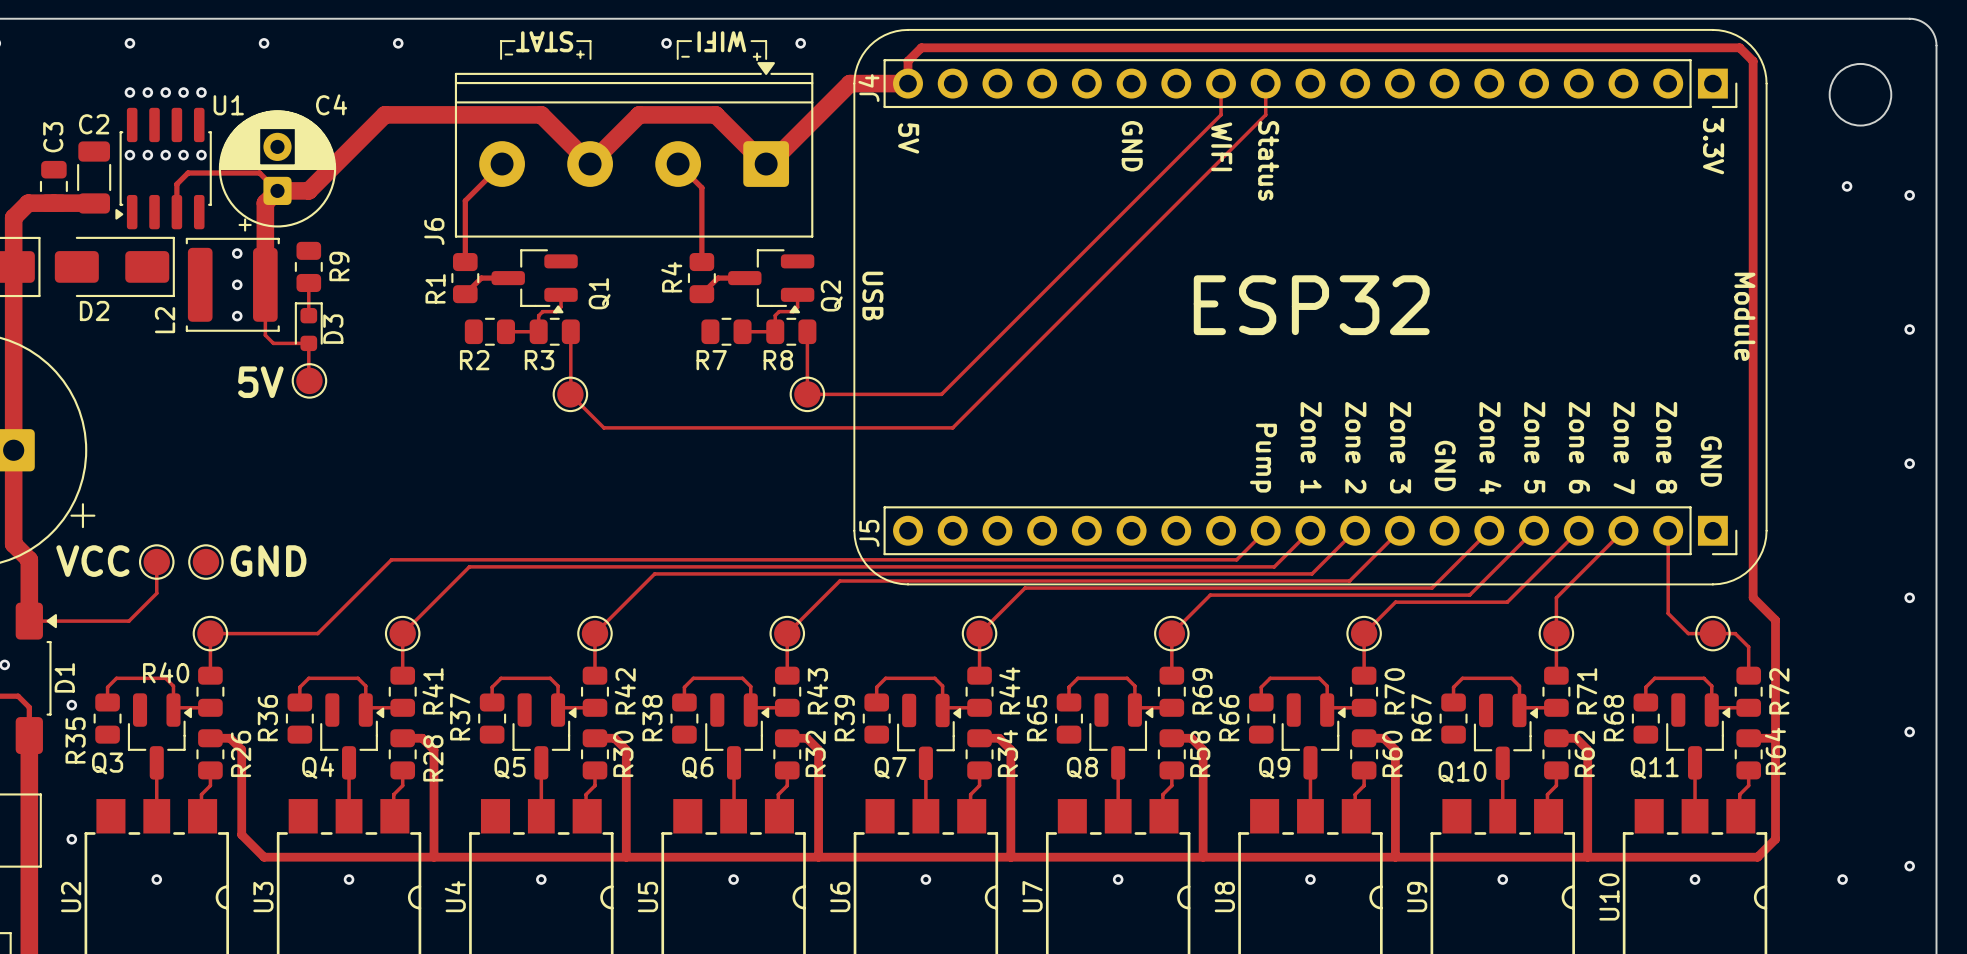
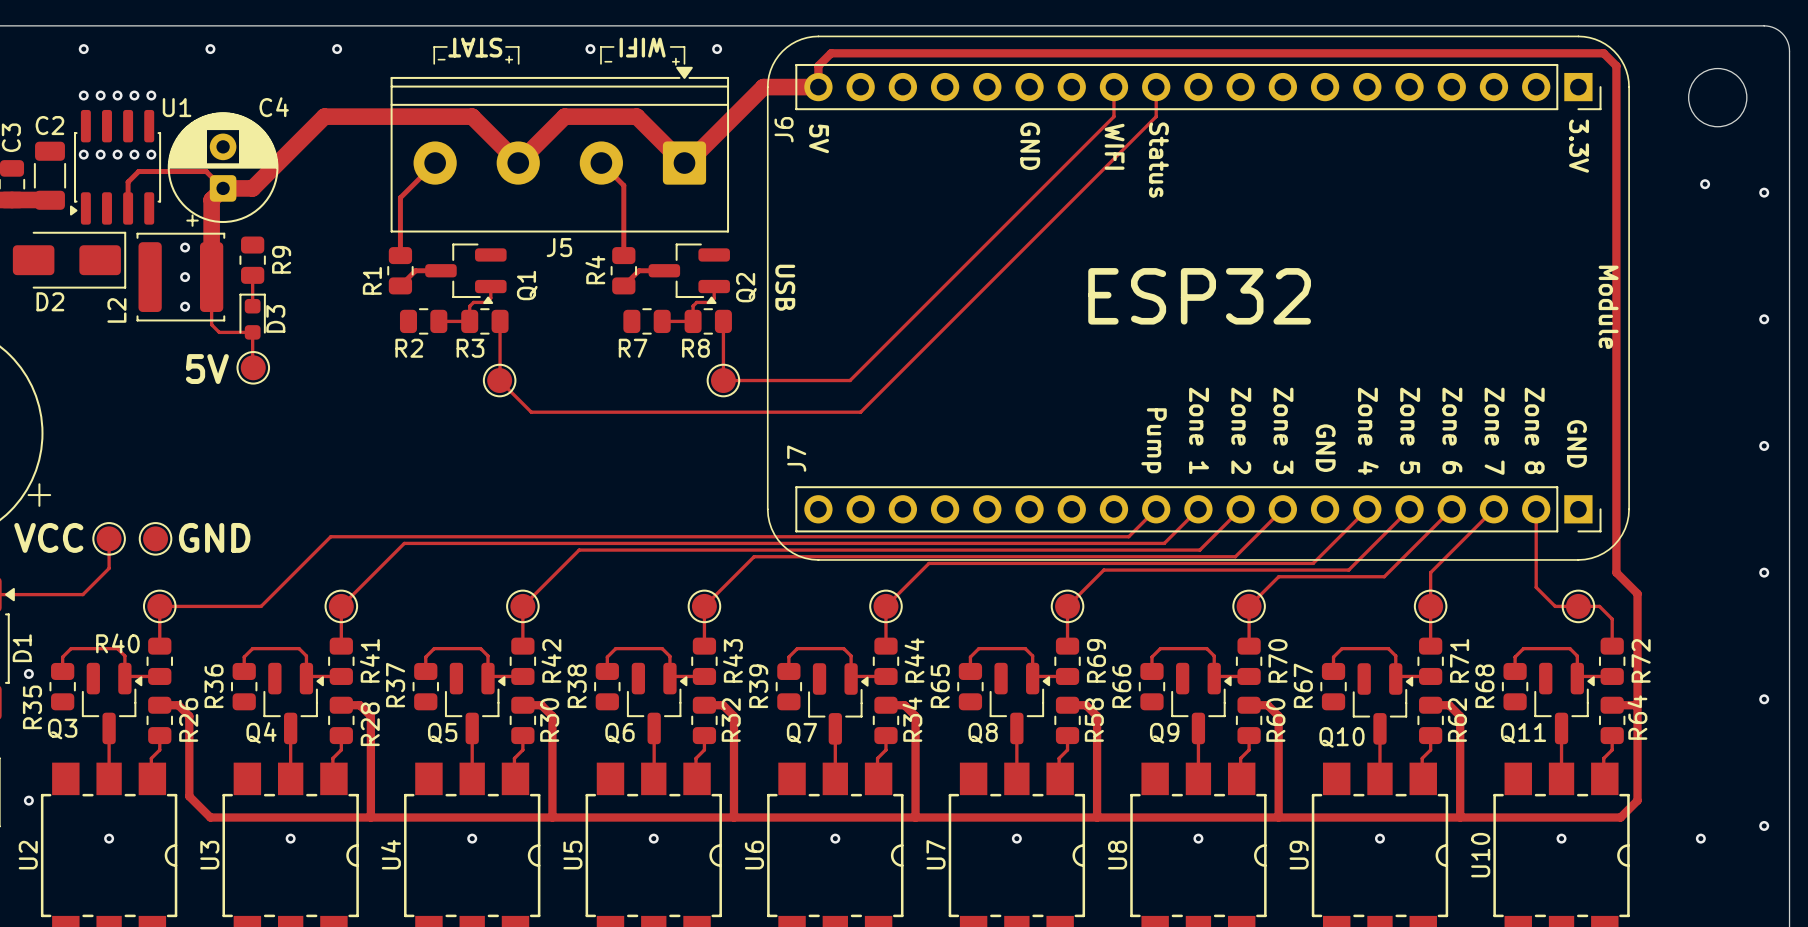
J4 name: J4 (868, 88) -> J6 (784, 129)
J6 name: J6 (434, 231) -> J5 (559, 247)
J5 name: J5 (869, 533) -> J7 (796, 458)

